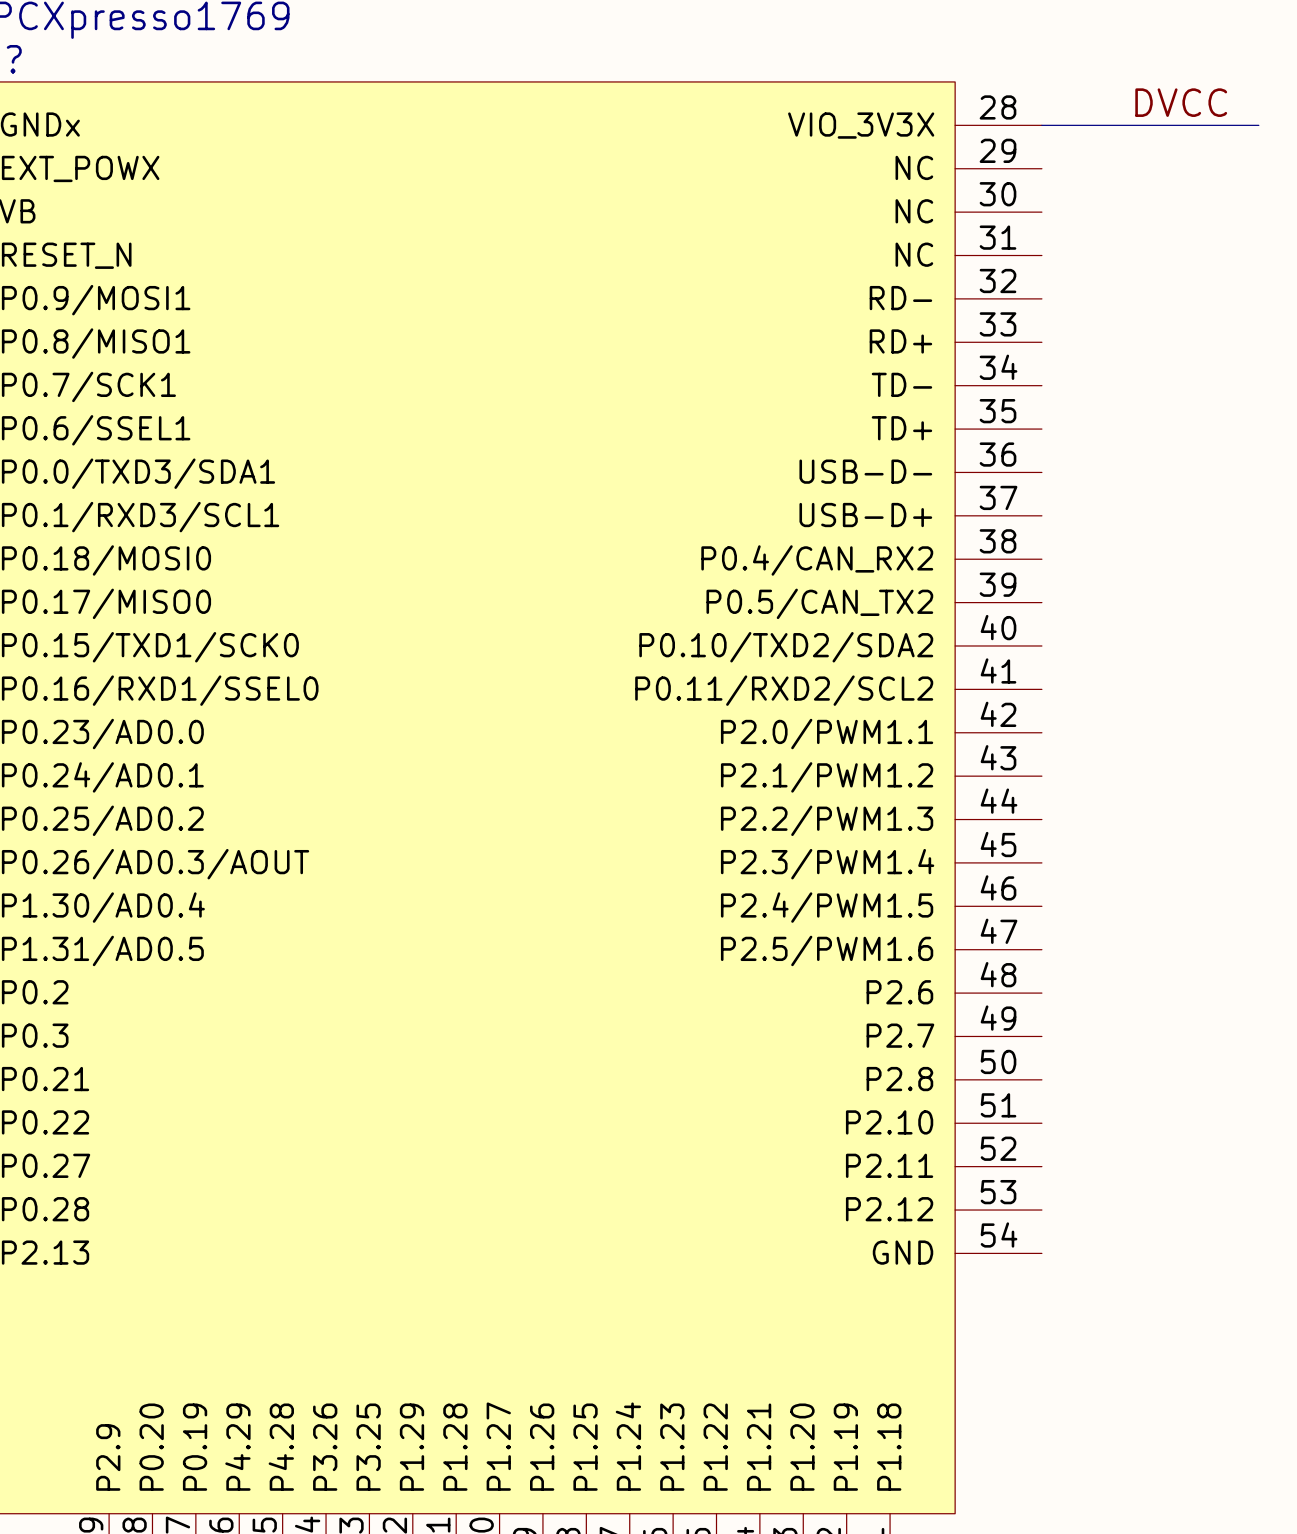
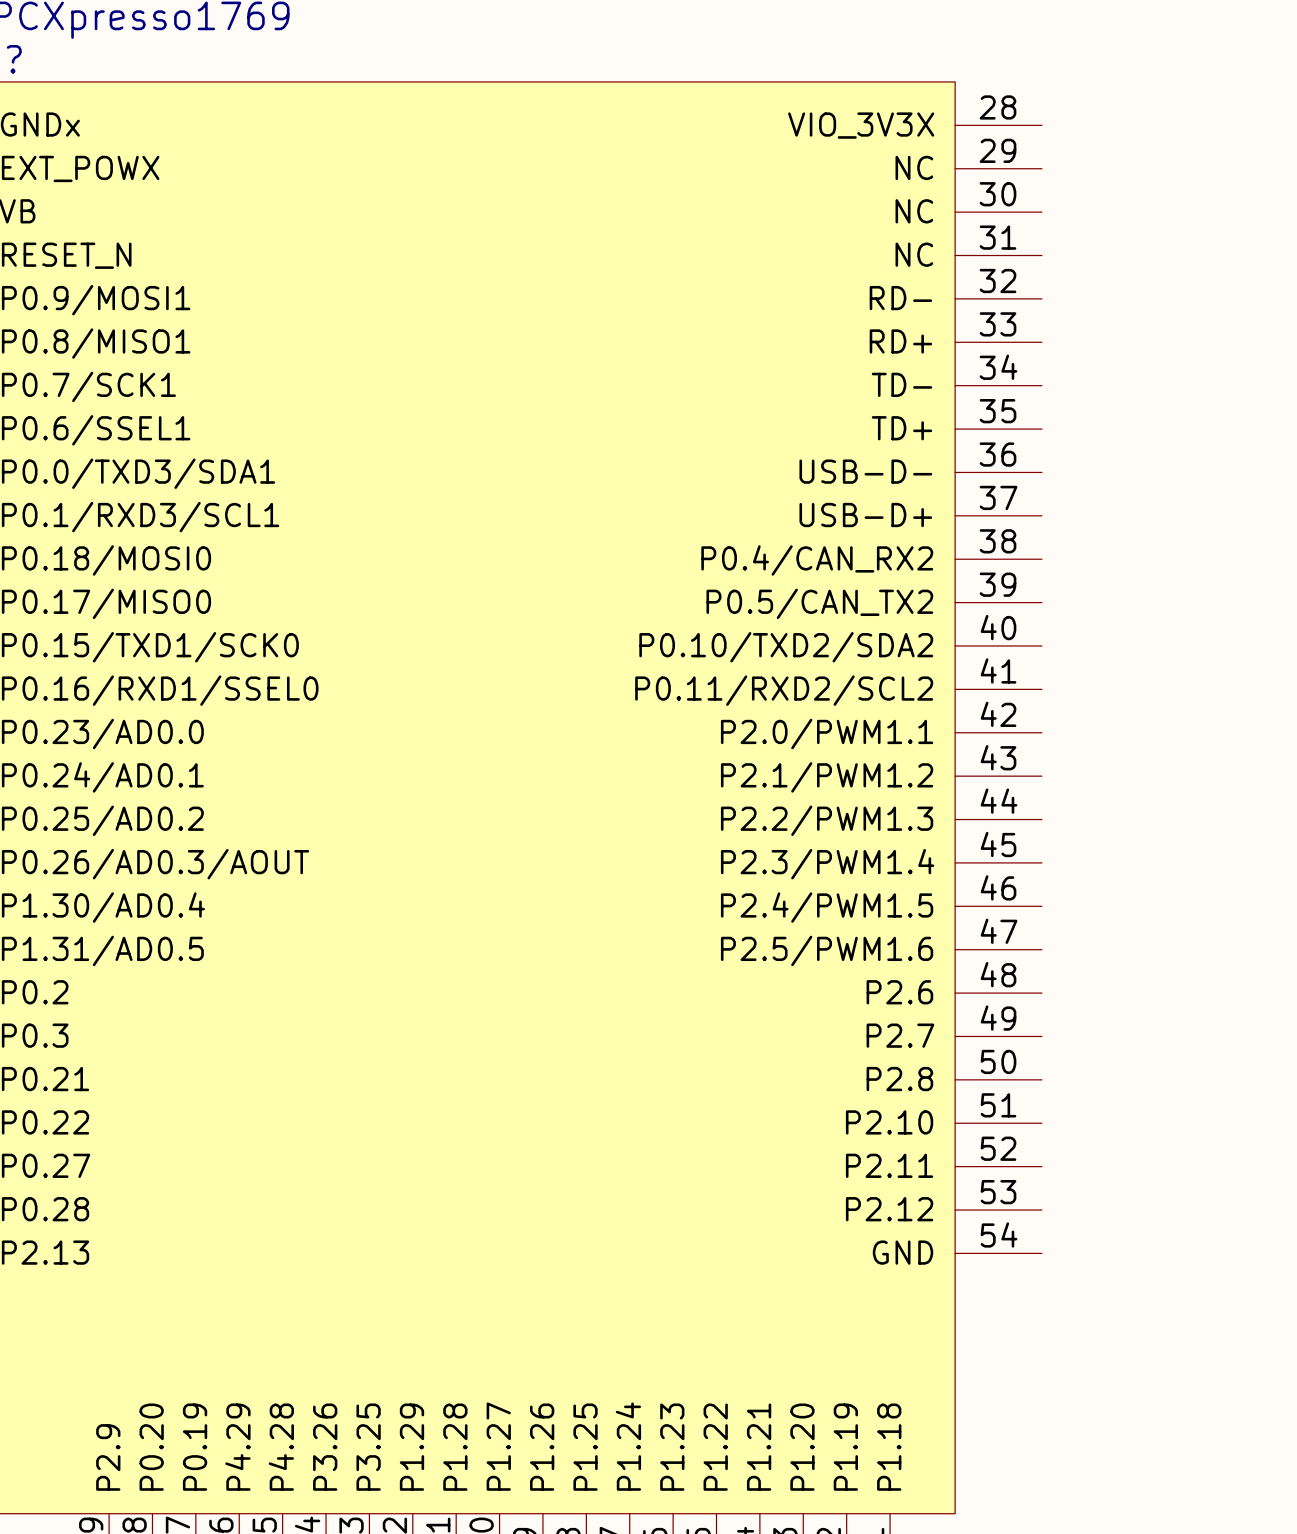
label: DVCC (1181, 102) -> none
wire: (1041, 125) (1258, 125) -> none

